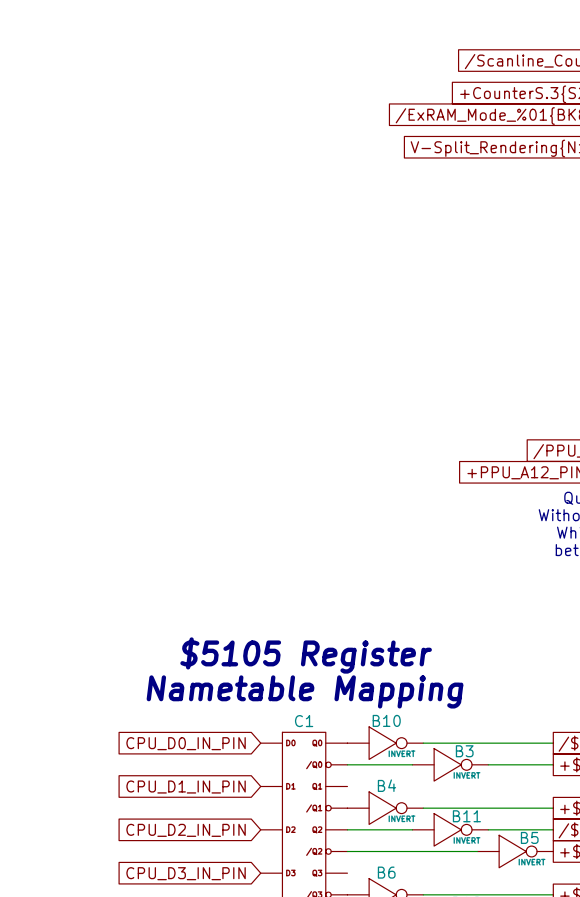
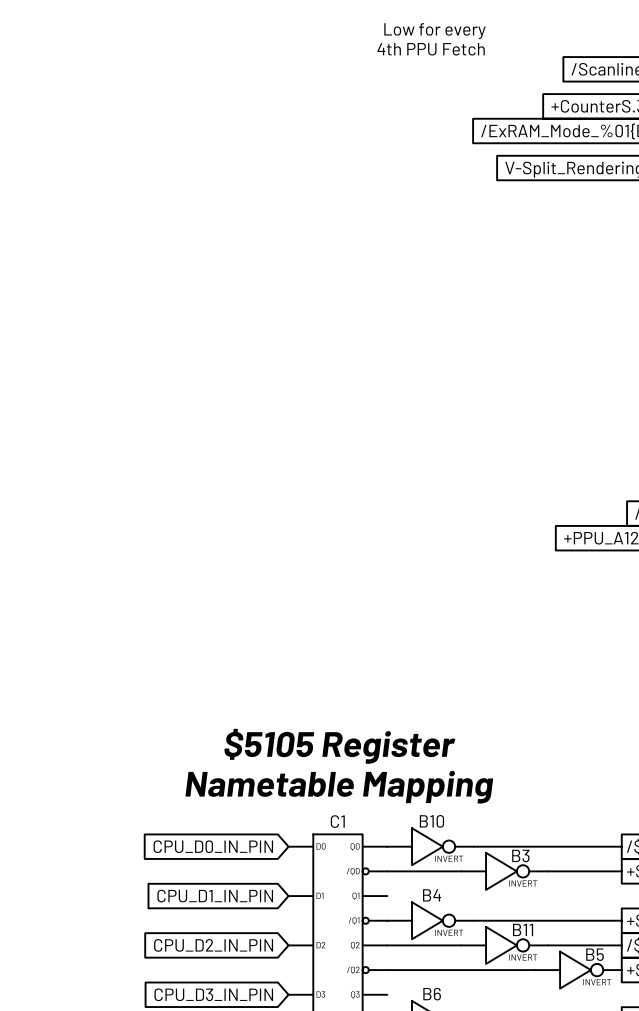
text: none -> Low for every (434, 31)
text: none -> 4th PPU Fetch (431, 49)

